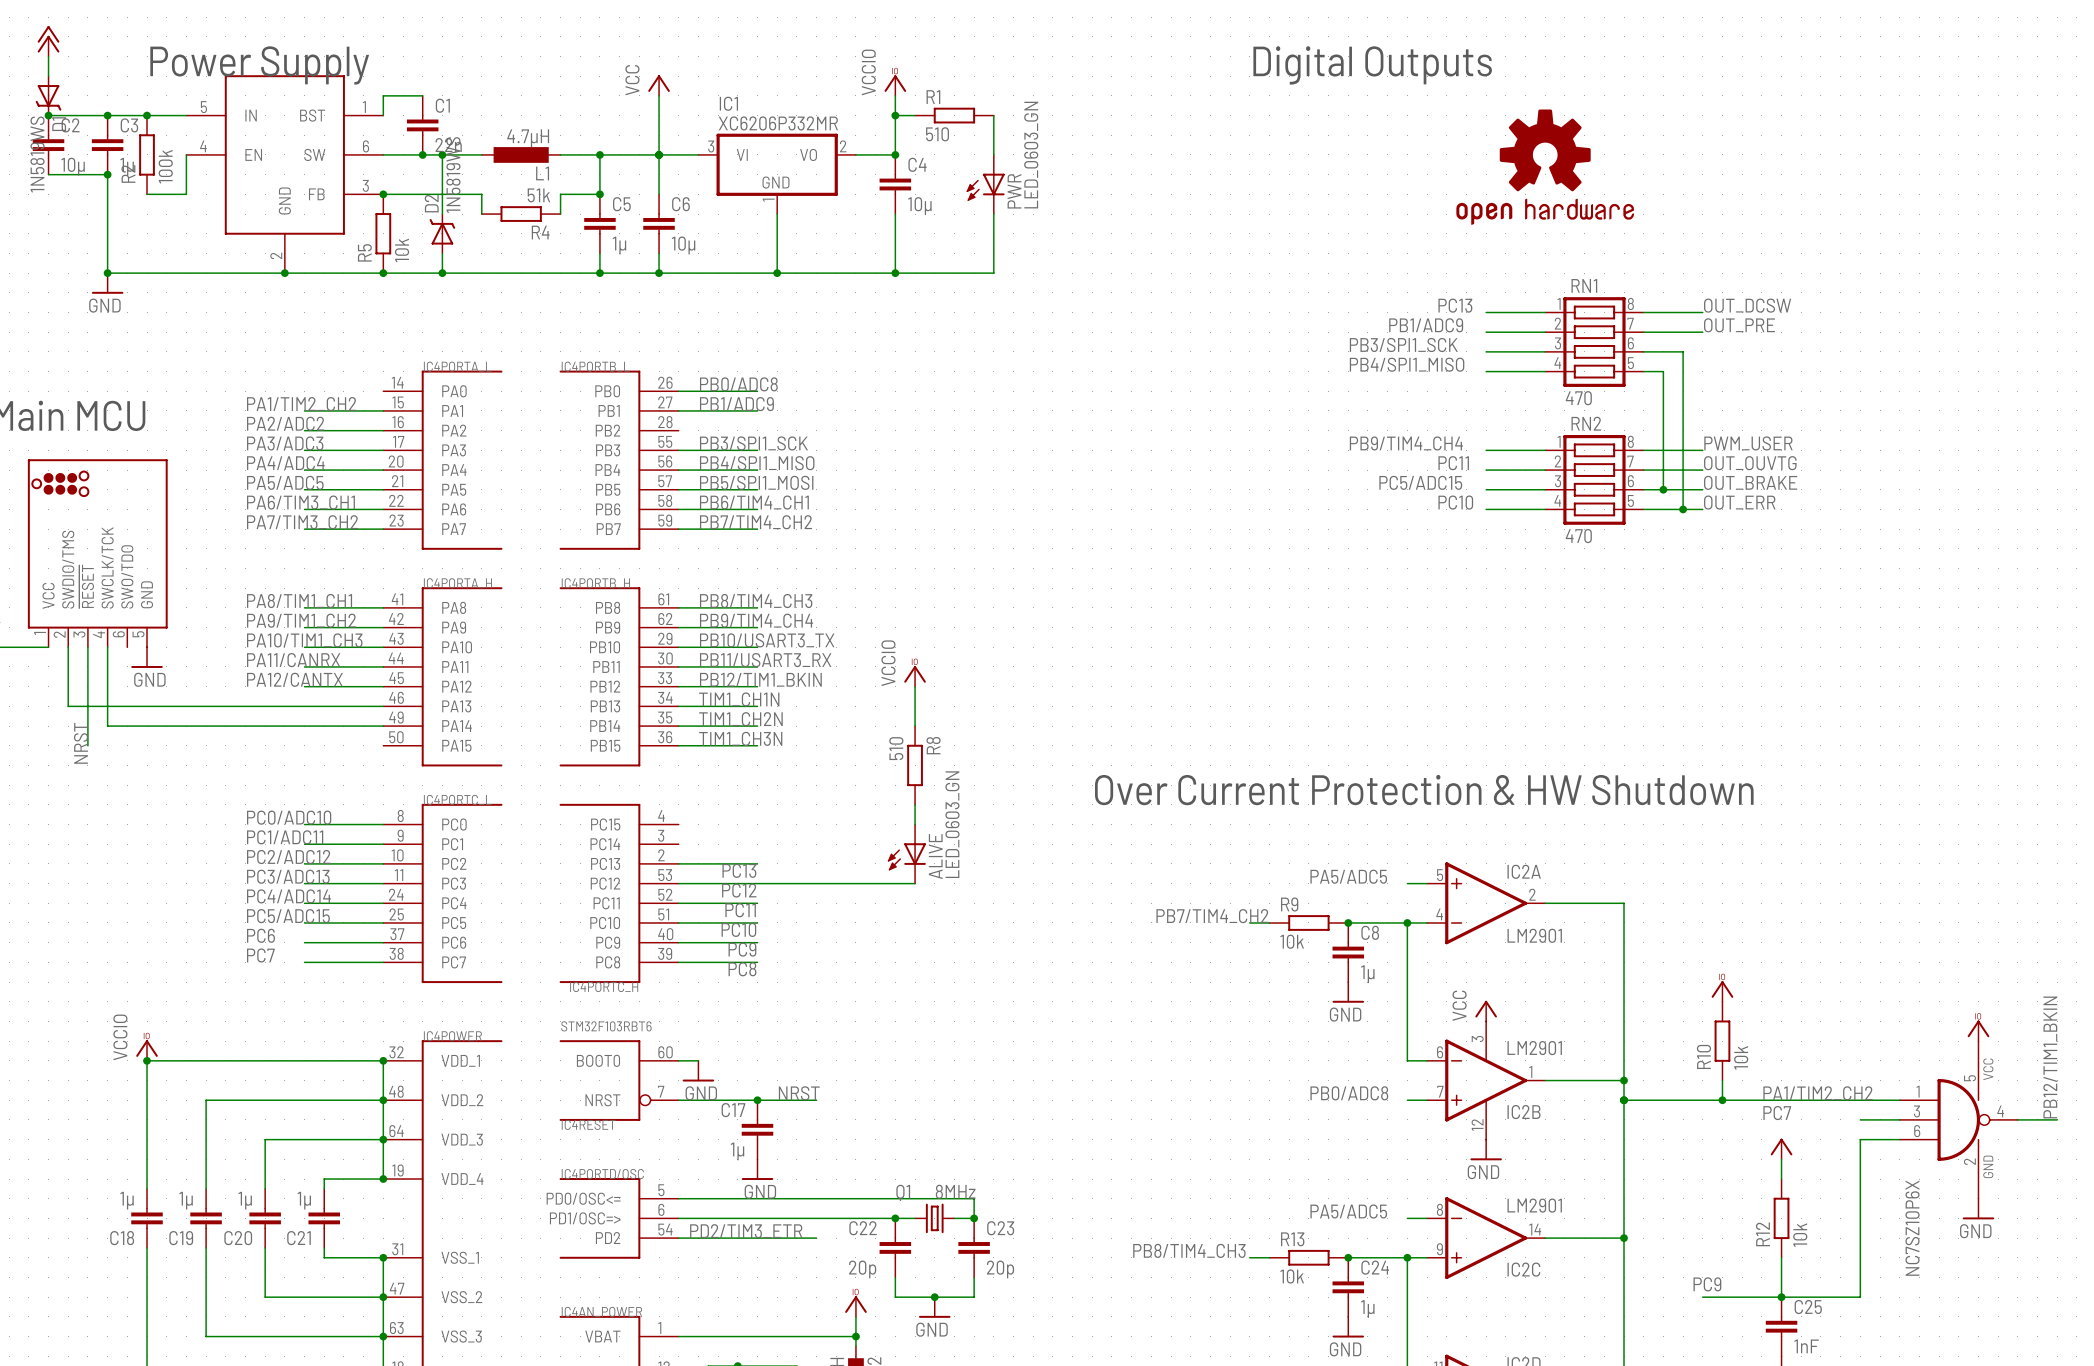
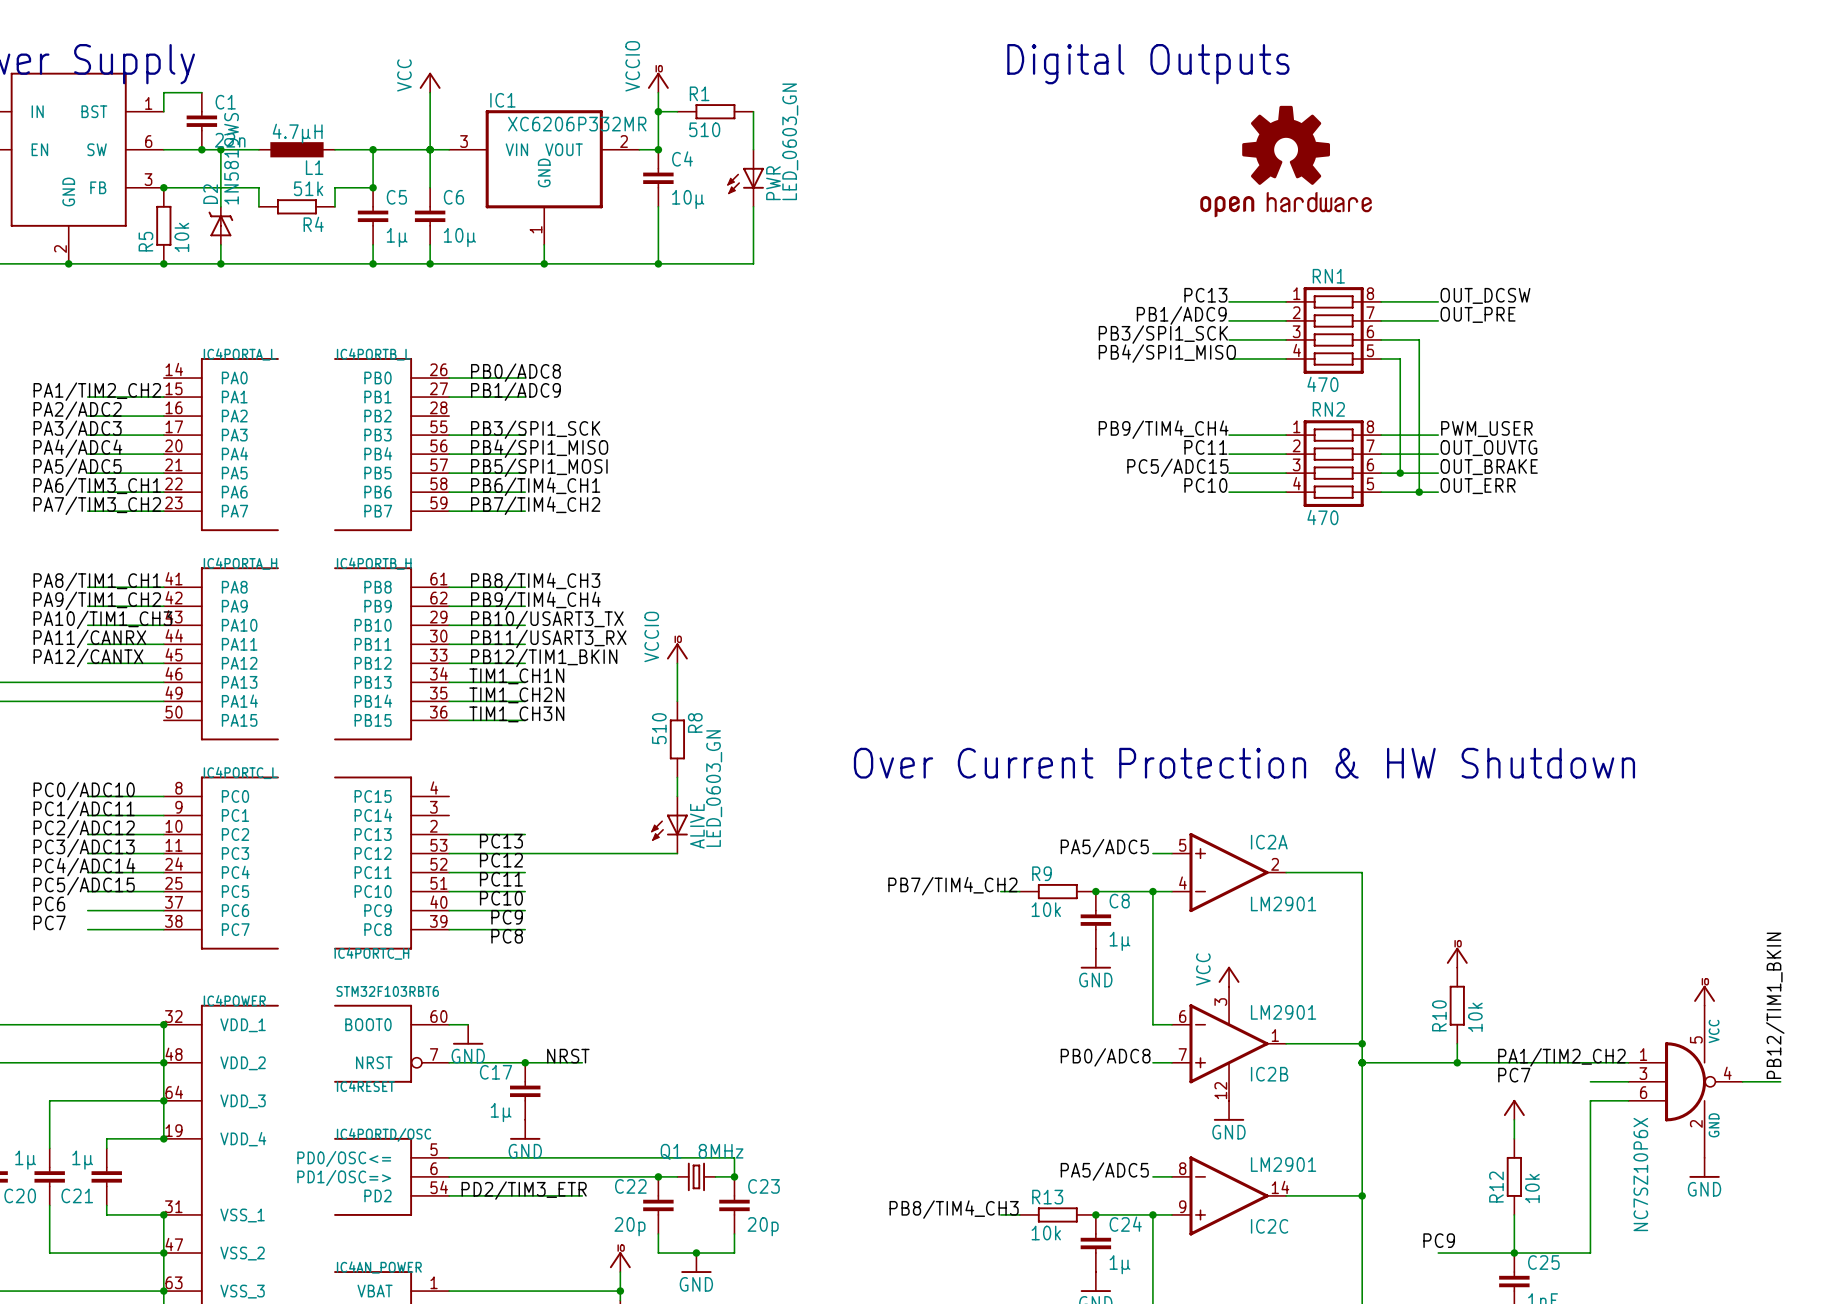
IC1 value position: XC6206P332MR (778, 123) -> XC6206P332MR (577, 124)
IC1 symbol: [698, 133, 856, 215] -> [449, 110, 640, 245]

